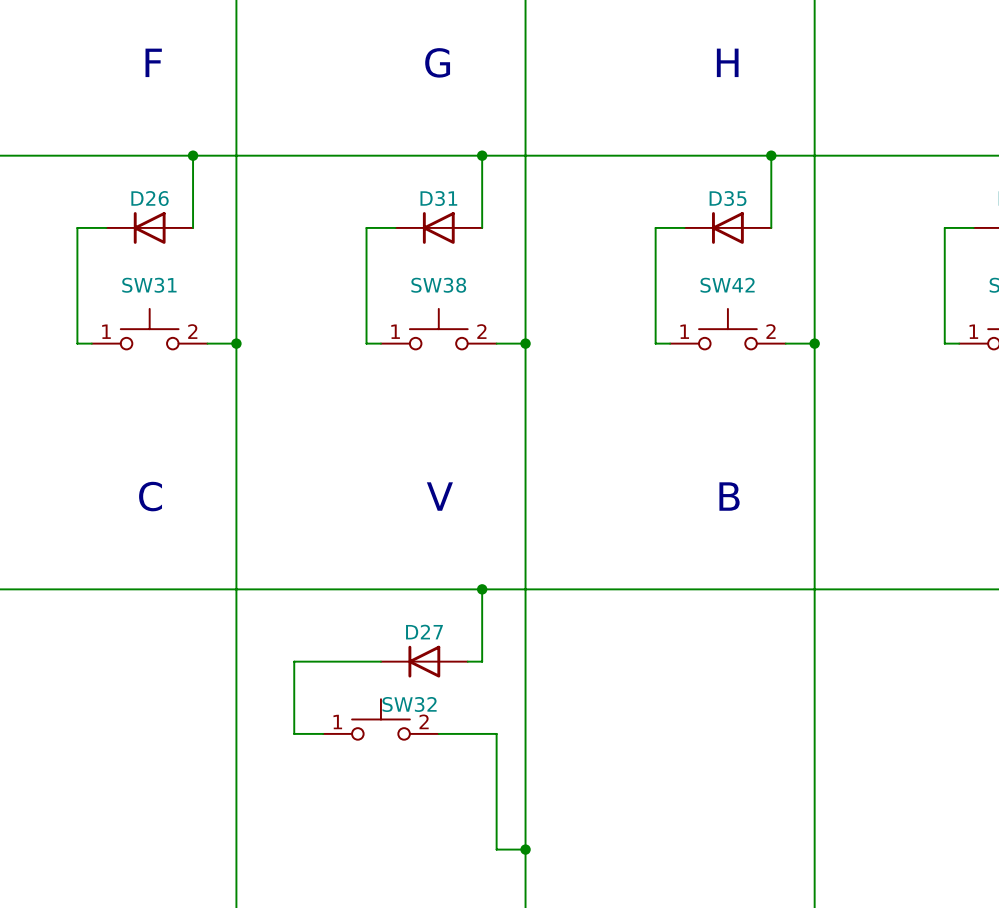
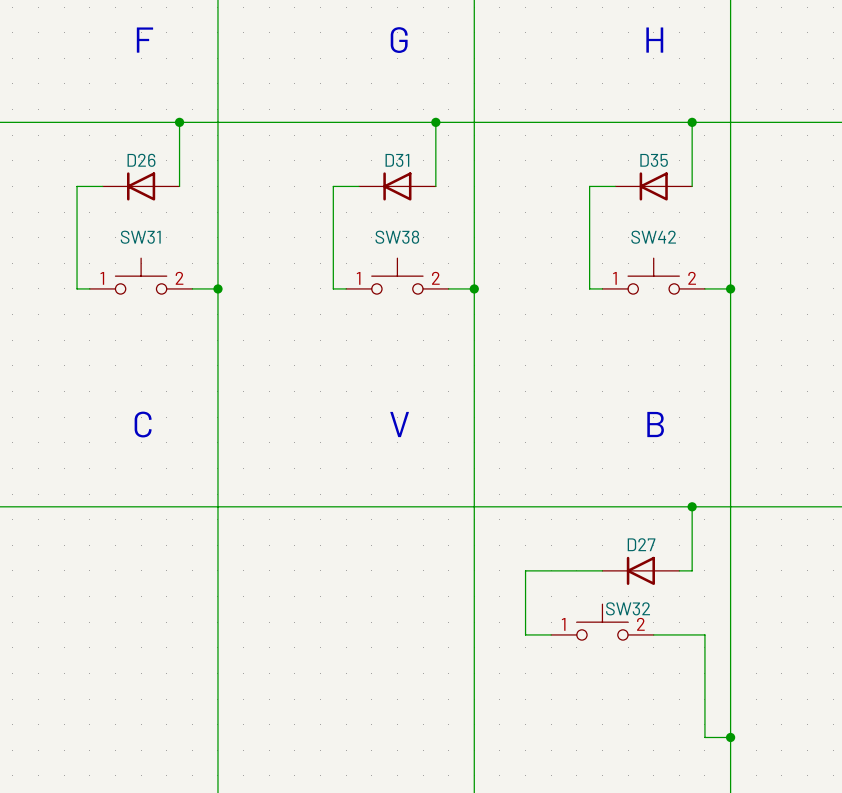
wire: (482, 589) (482, 661) (467, 661) -> none
junction: (482, 589) -> none
wire: none -> (692, 506) (692, 570) (679, 570)
junction: none -> (692, 506)
wire: (380, 661) (294, 661) (294, 733) (323, 733) -> none
D27 position: (424, 661) -> (640, 570)
wire: none -> (602, 570) (525, 570) (525, 634) (551, 634)
SW32 position: (380, 719) -> (602, 622)
wire: (438, 733) (496, 733) (496, 849) (525, 849) -> none
wire: none -> (653, 634) (704, 634) (704, 737) (730, 737)
junction: (525, 849) -> none
junction: none -> (730, 737)

